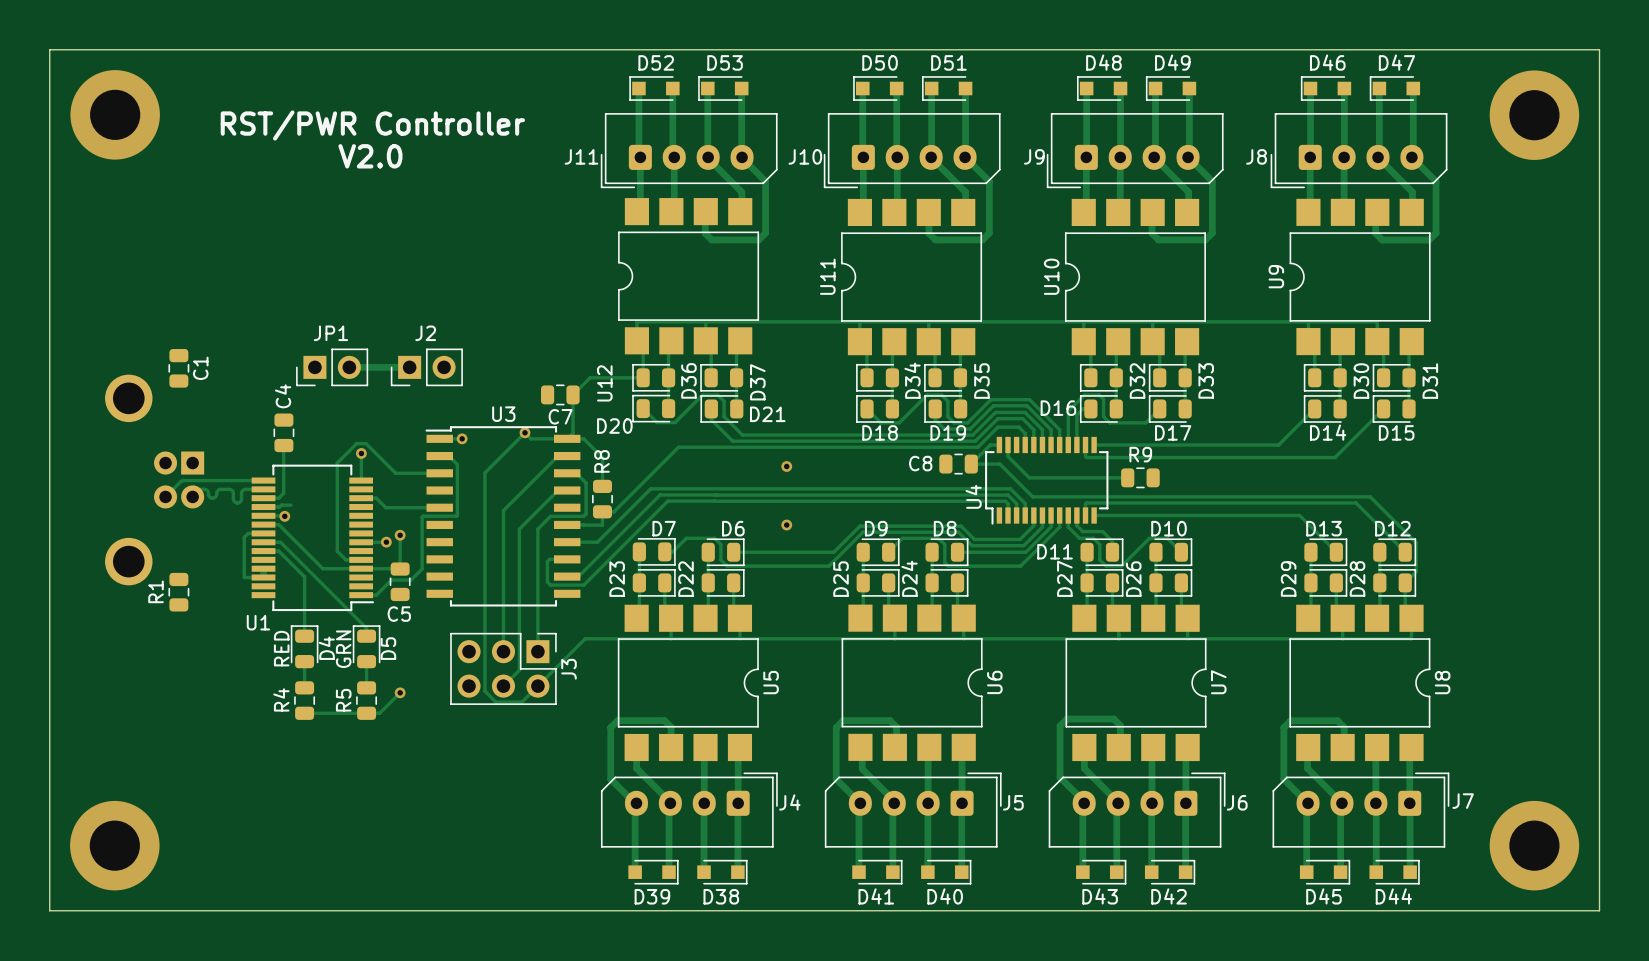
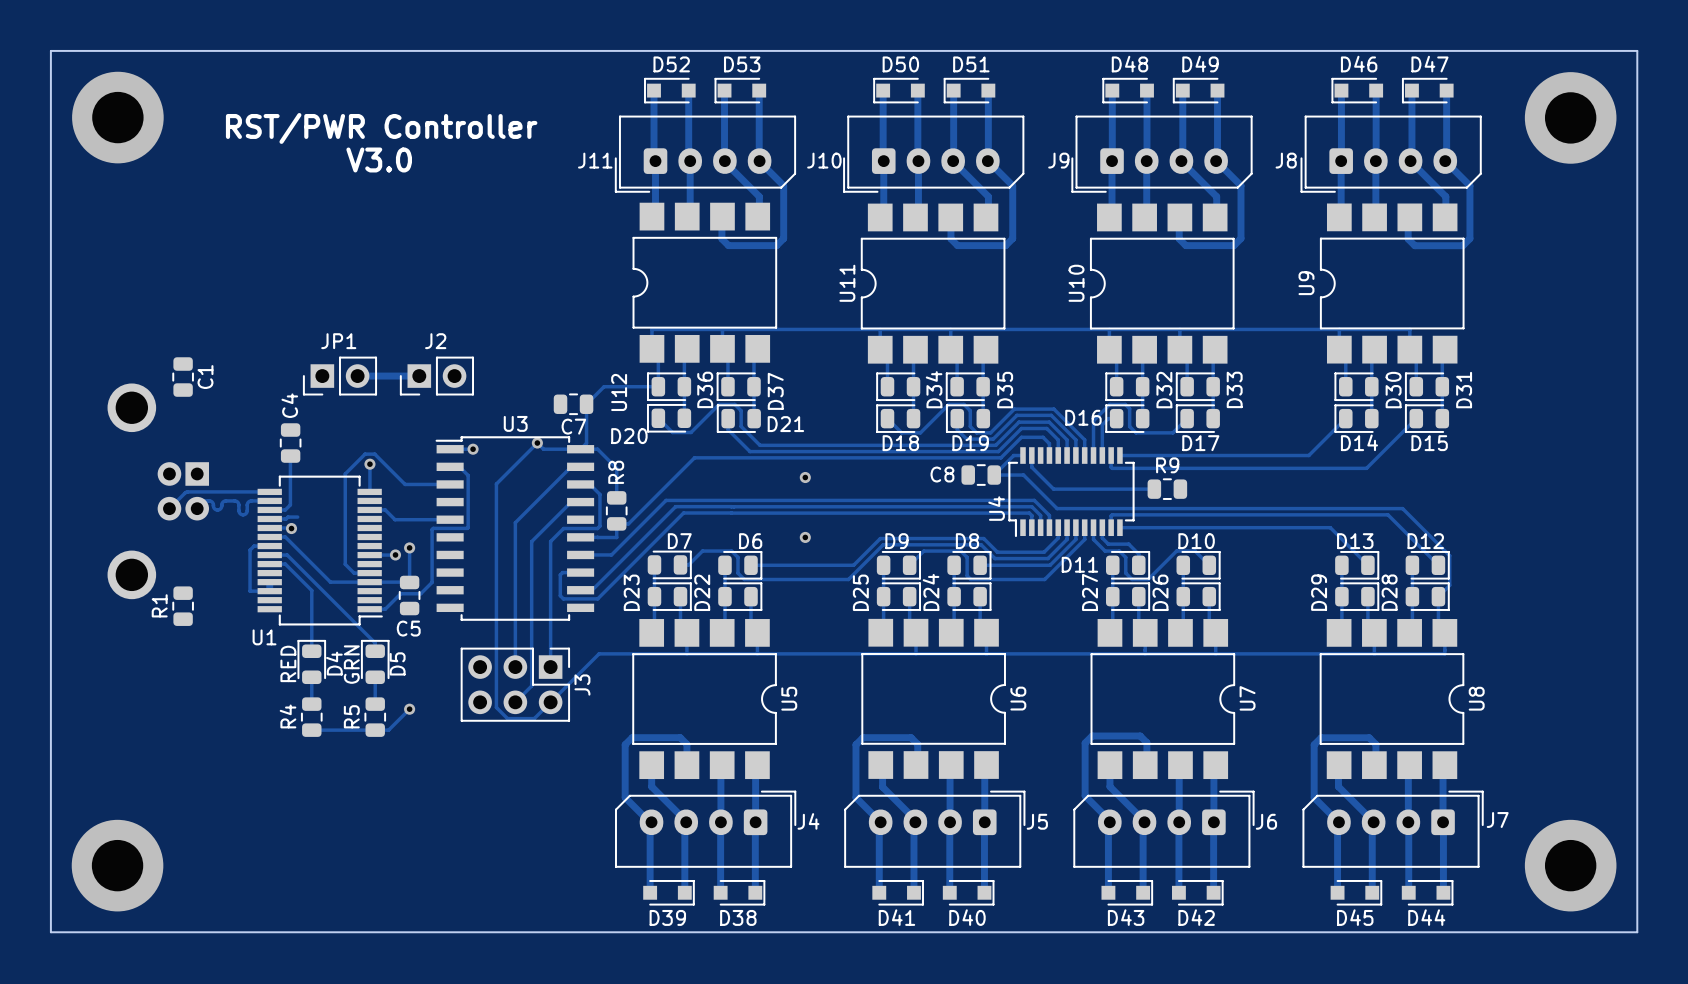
text: V2.0 (370, 156) -> V3.0 (379, 159)

